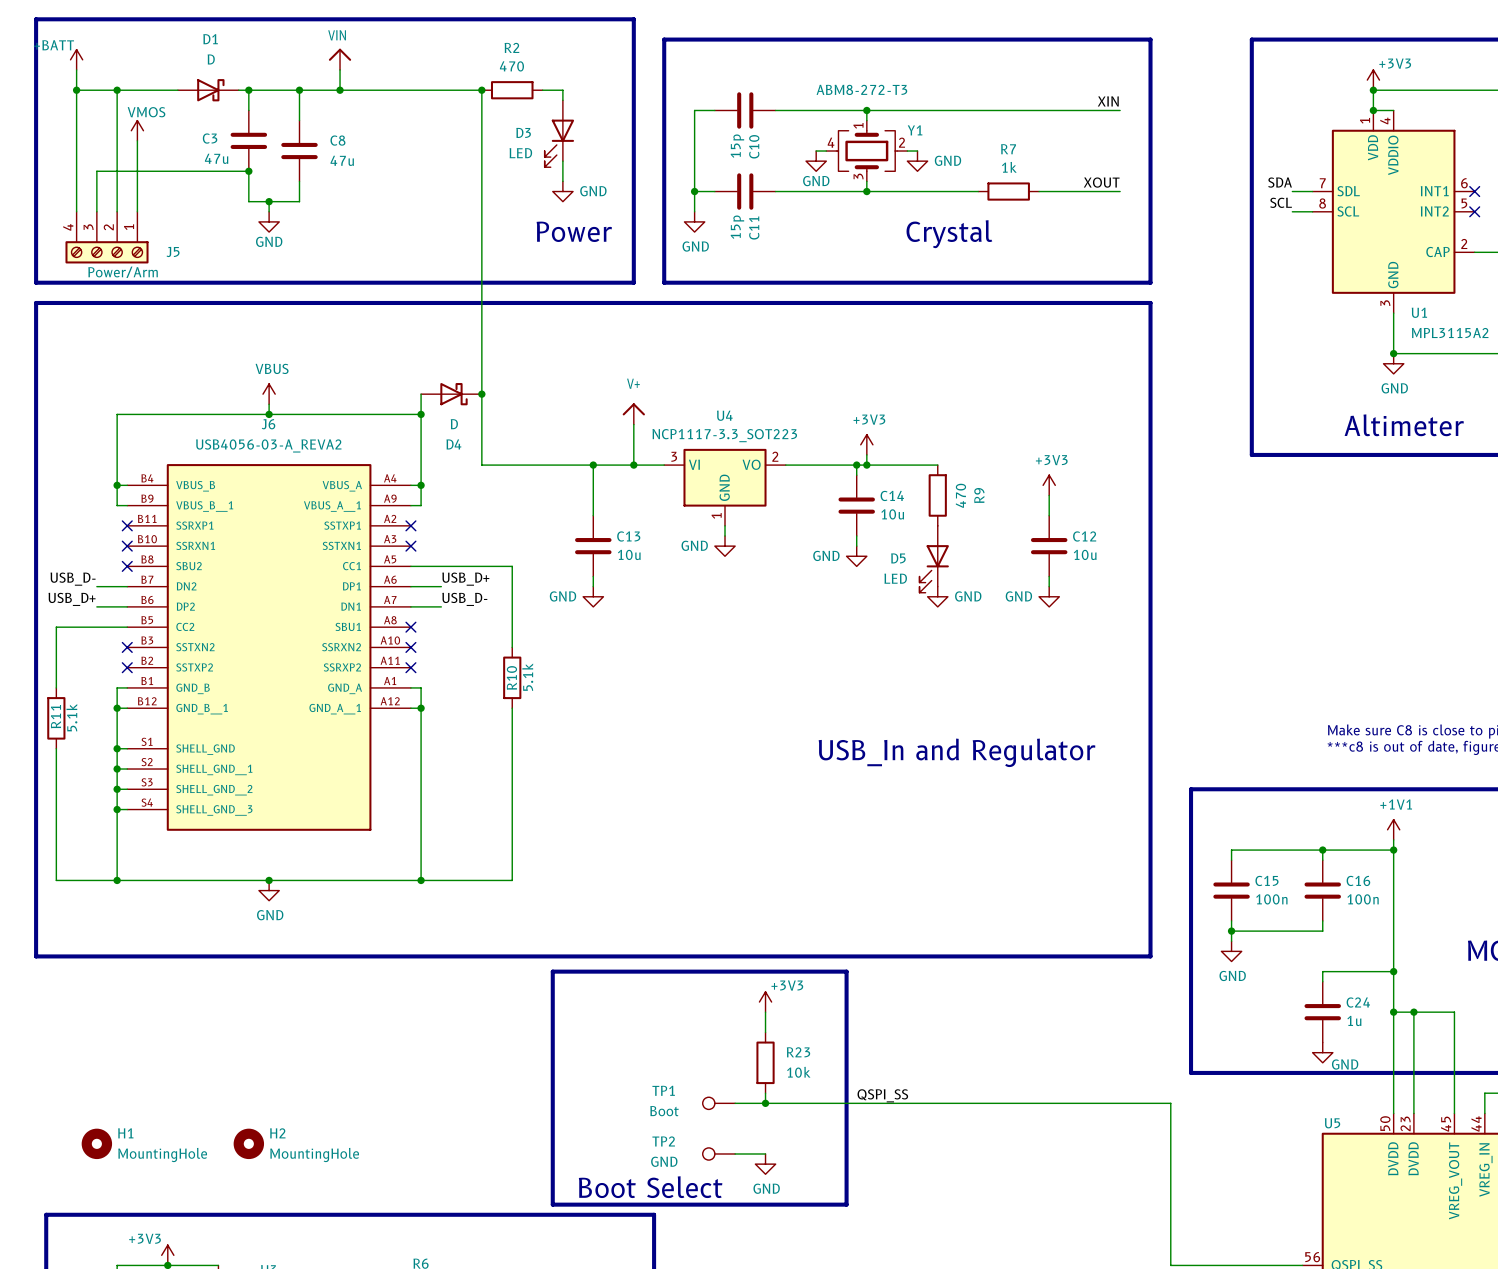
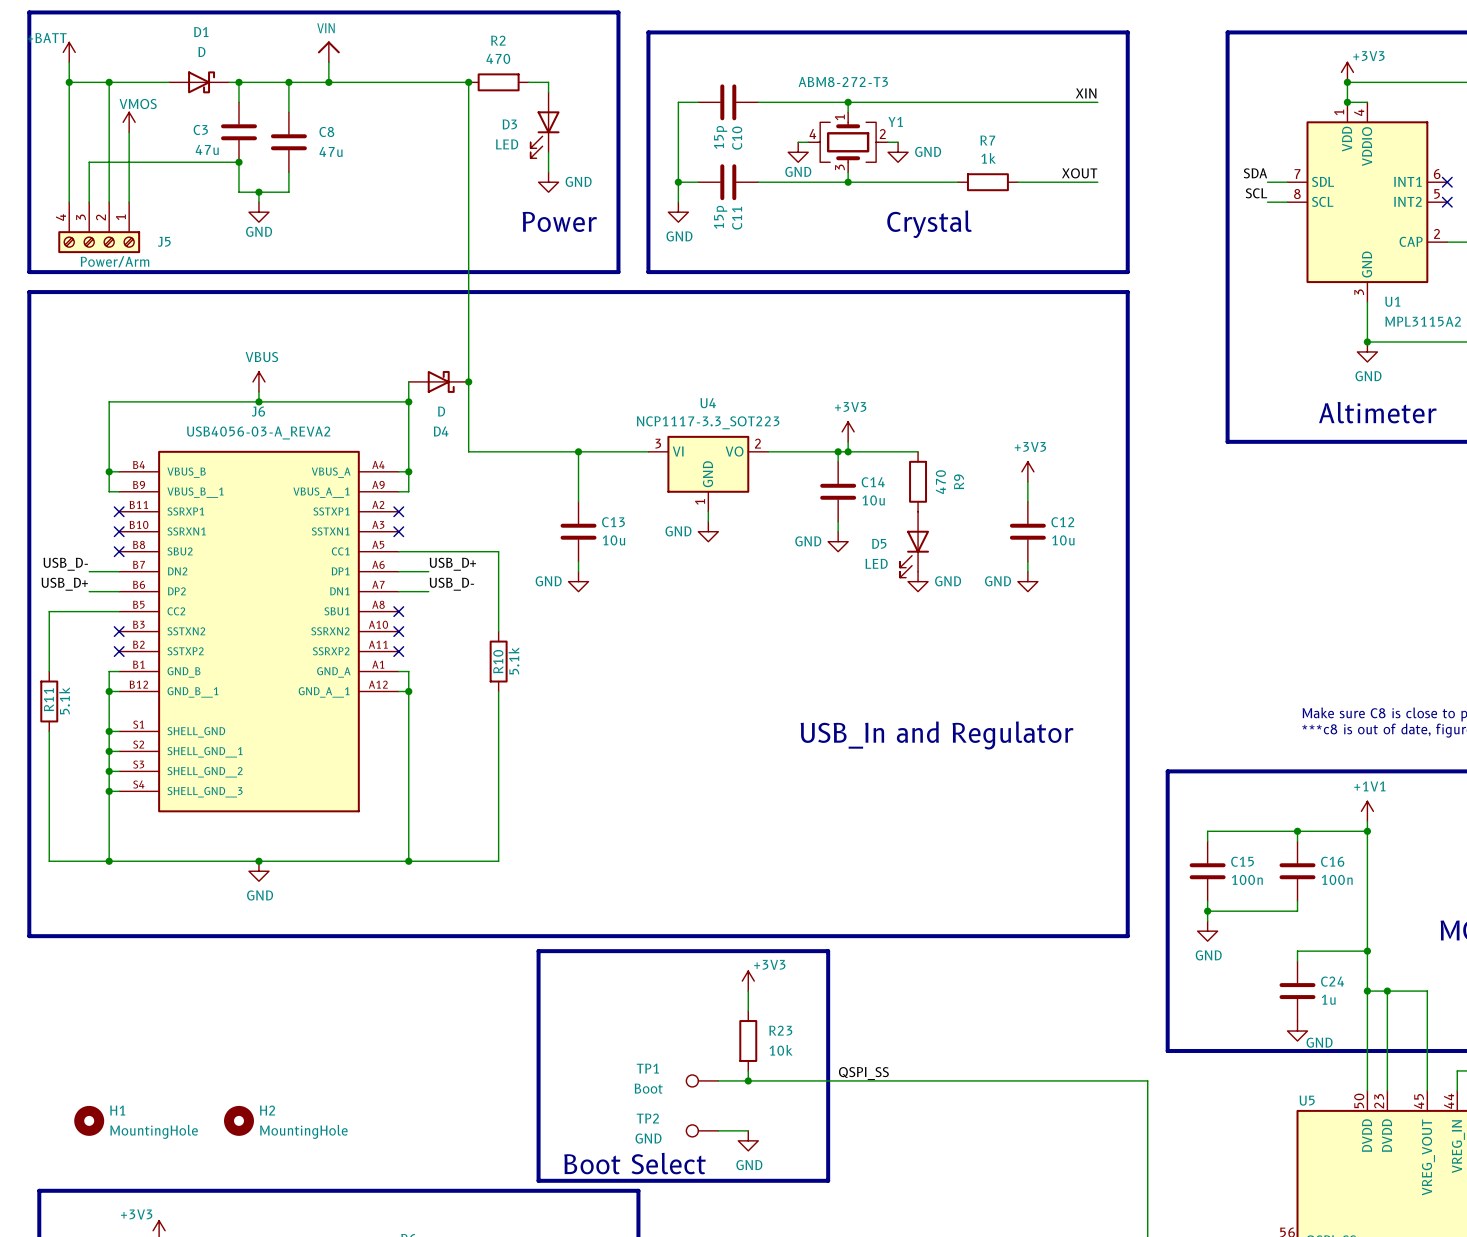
power symbol: V+ (633, 413) -> none
wire: (633, 424) (633, 465) -> none
junction: (633, 465) -> none

